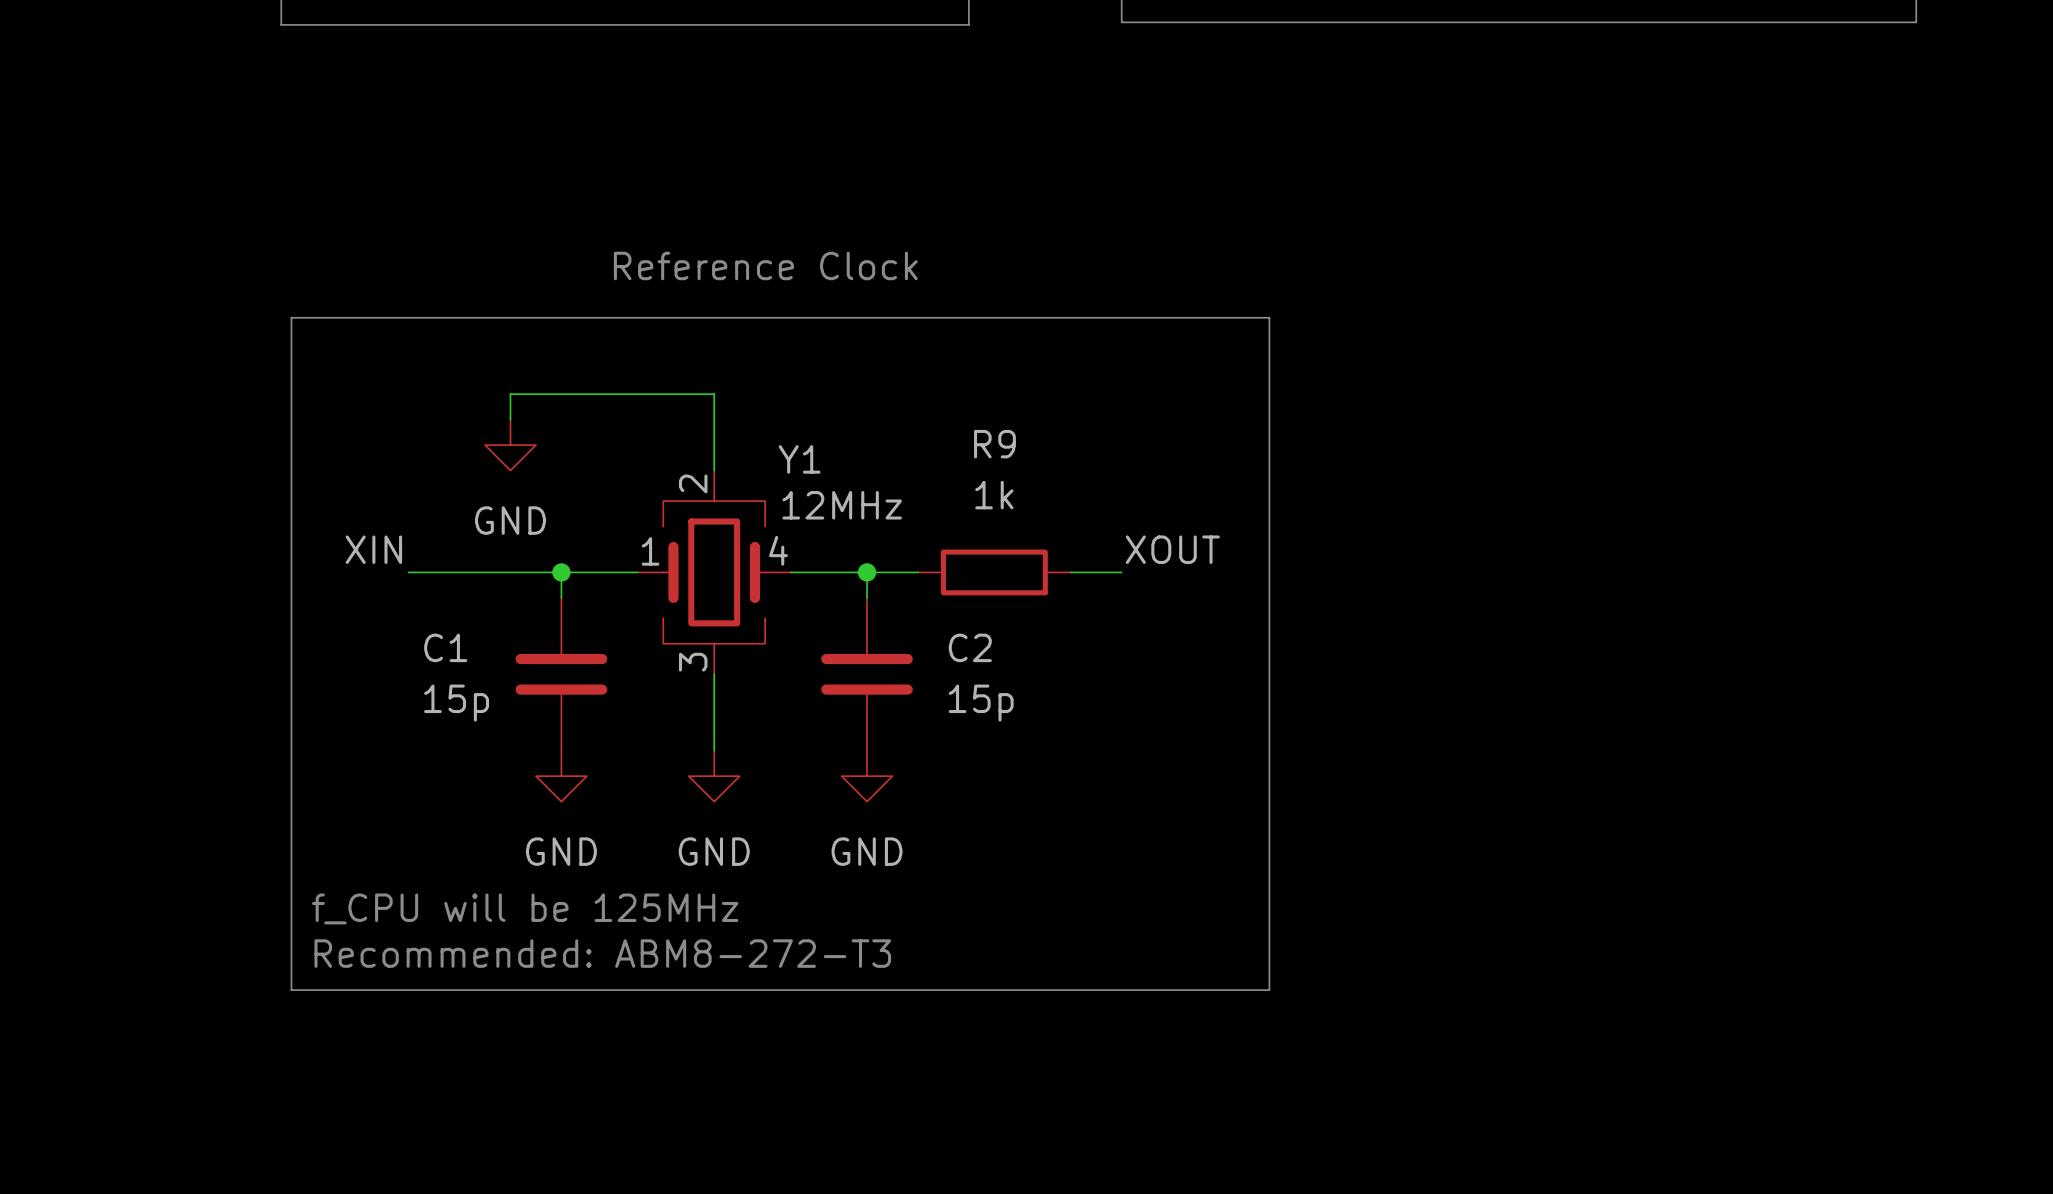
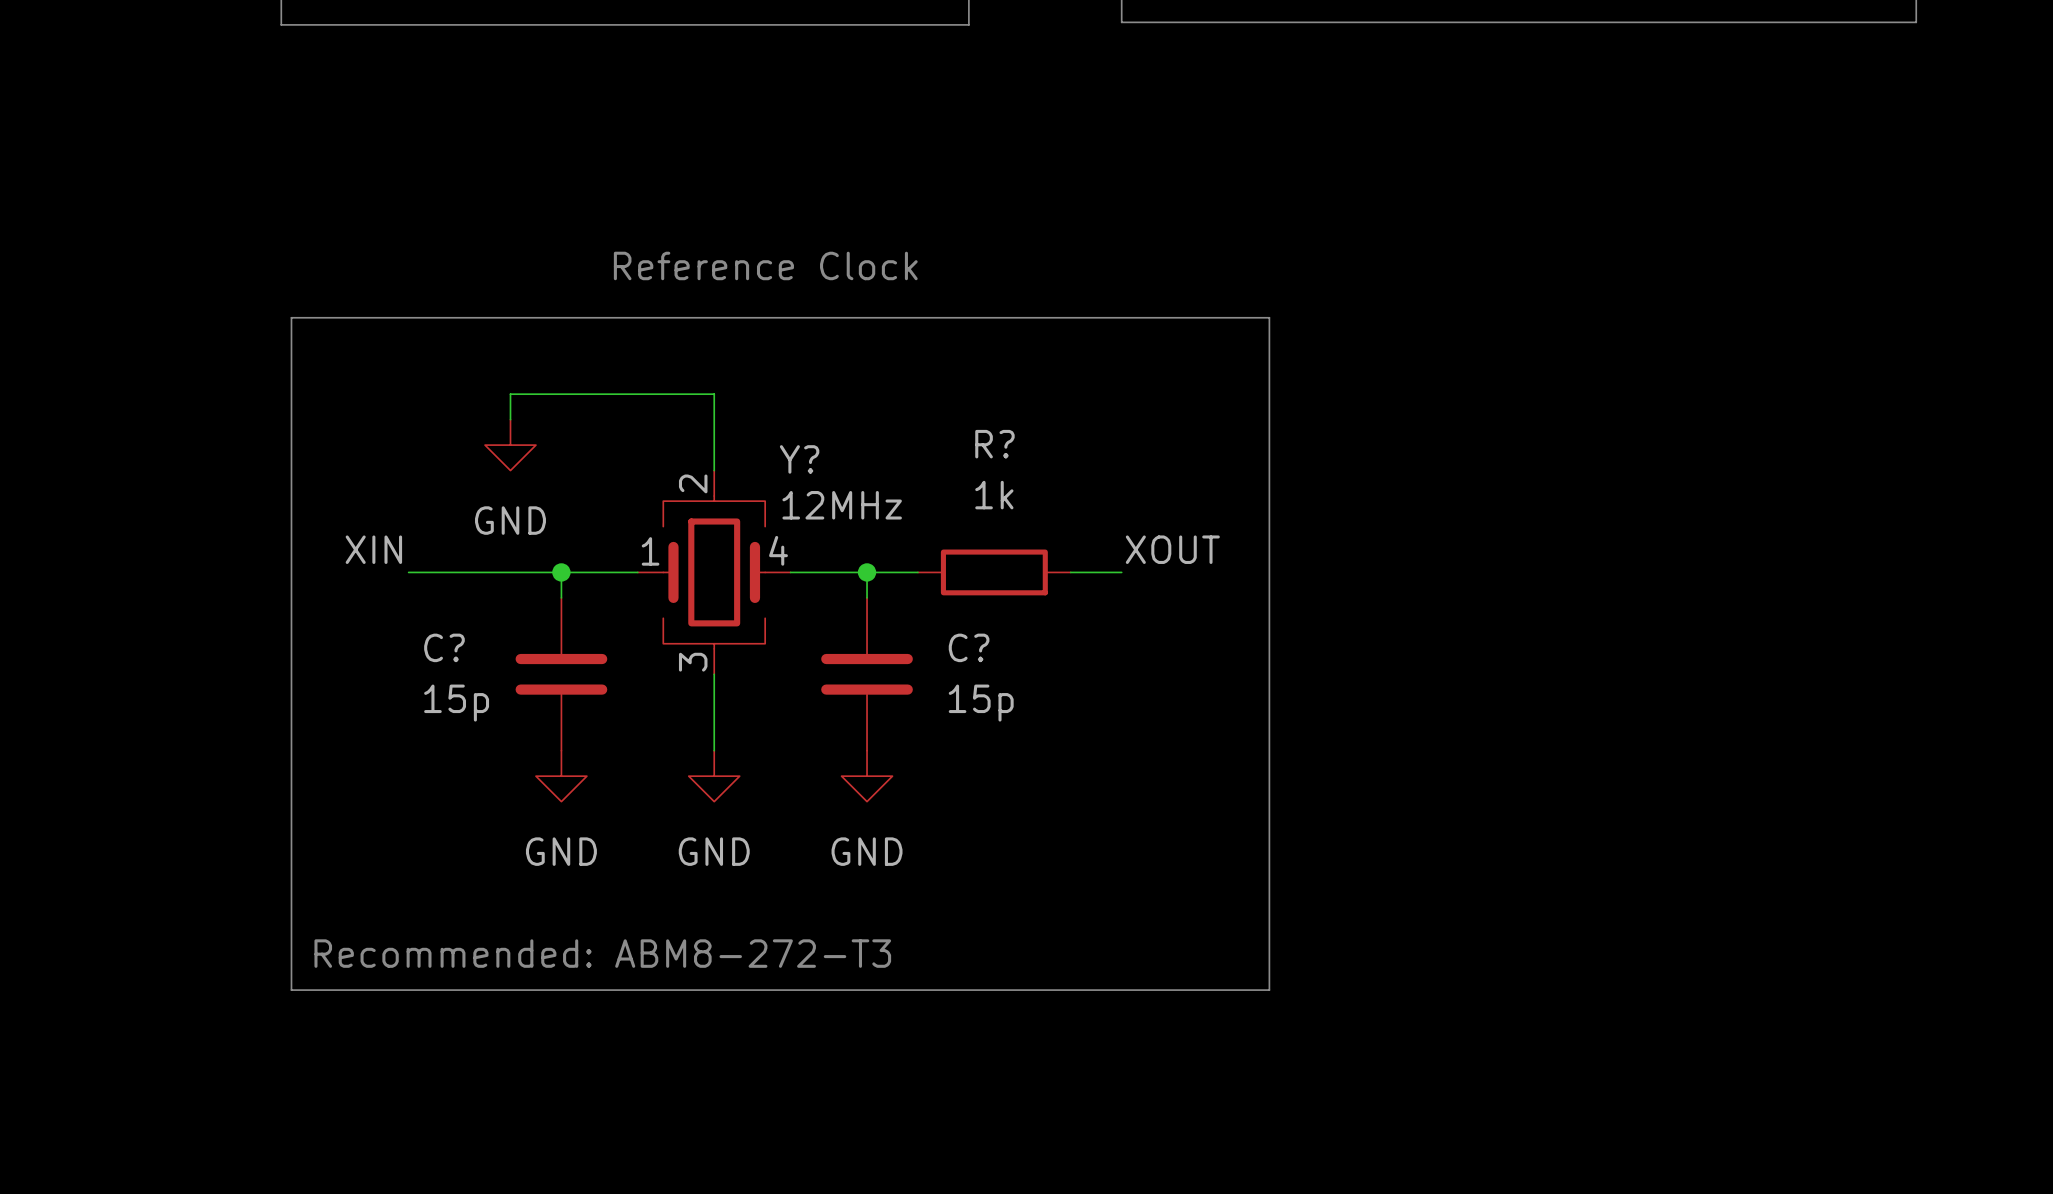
R9 name: R9 (994, 444) -> R? (994, 444)
Y1 name: Y1 (799, 459) -> Y? (799, 459)
C1 name: C1 (445, 647) -> C? (444, 647)
C2 name: C2 (970, 647) -> C? (969, 647)
text: f_CPU will be 125MHz (525, 908) -> none

